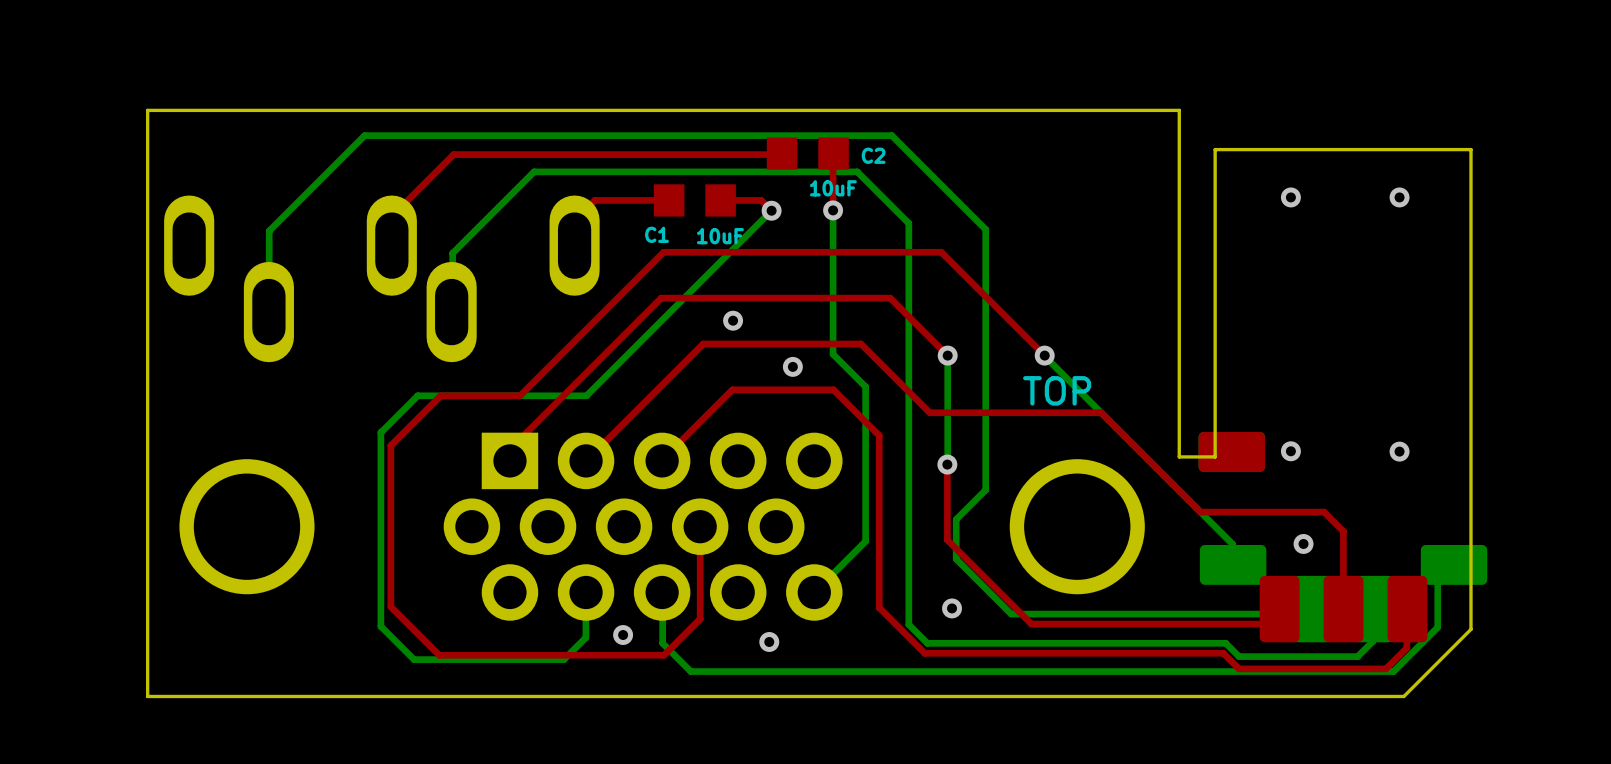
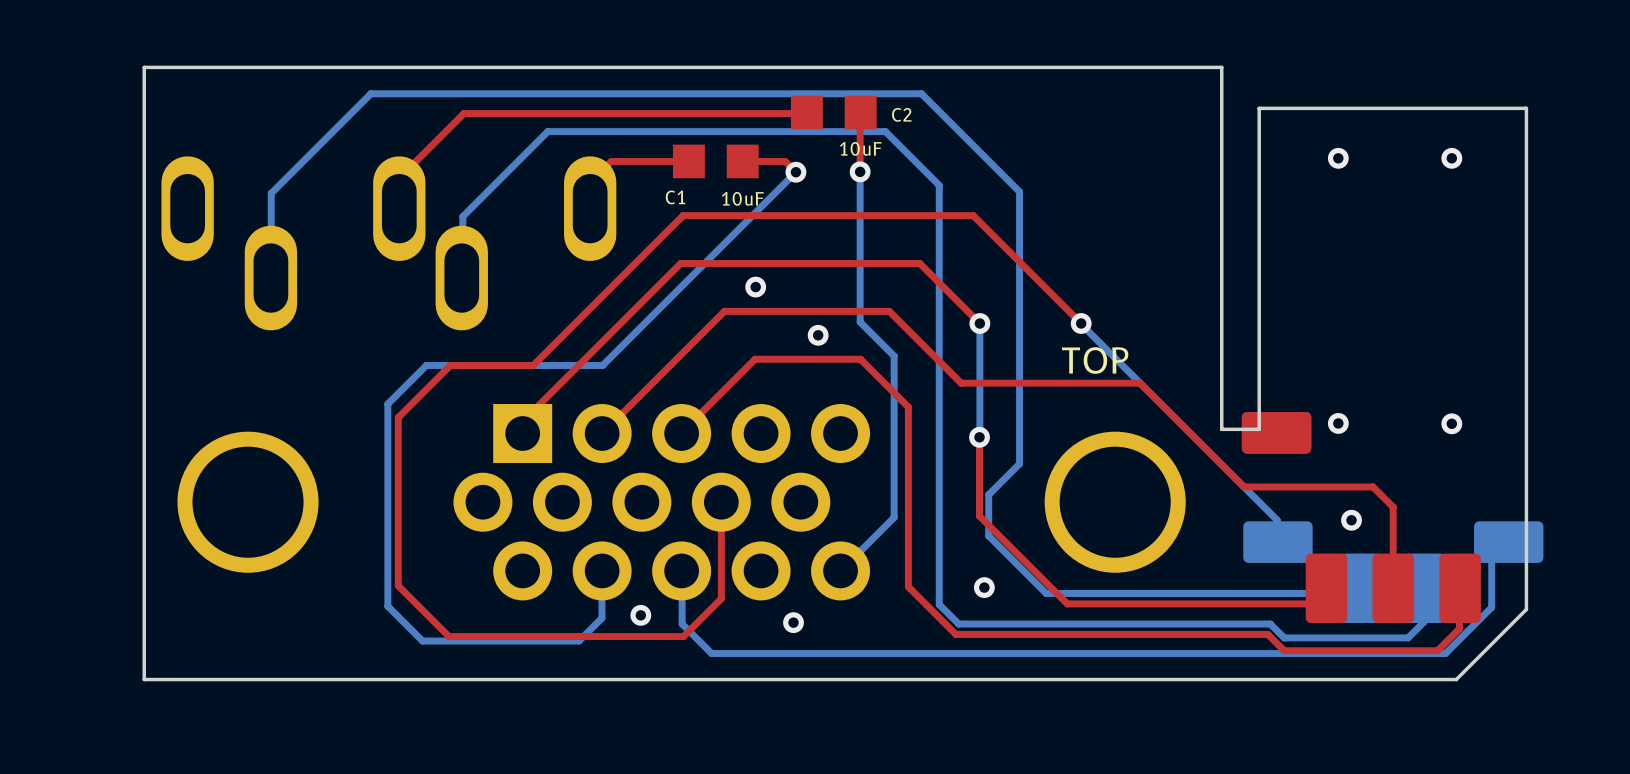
part footprint: [1198, 432, 1488, 643] -> [1241, 411, 1544, 623]

